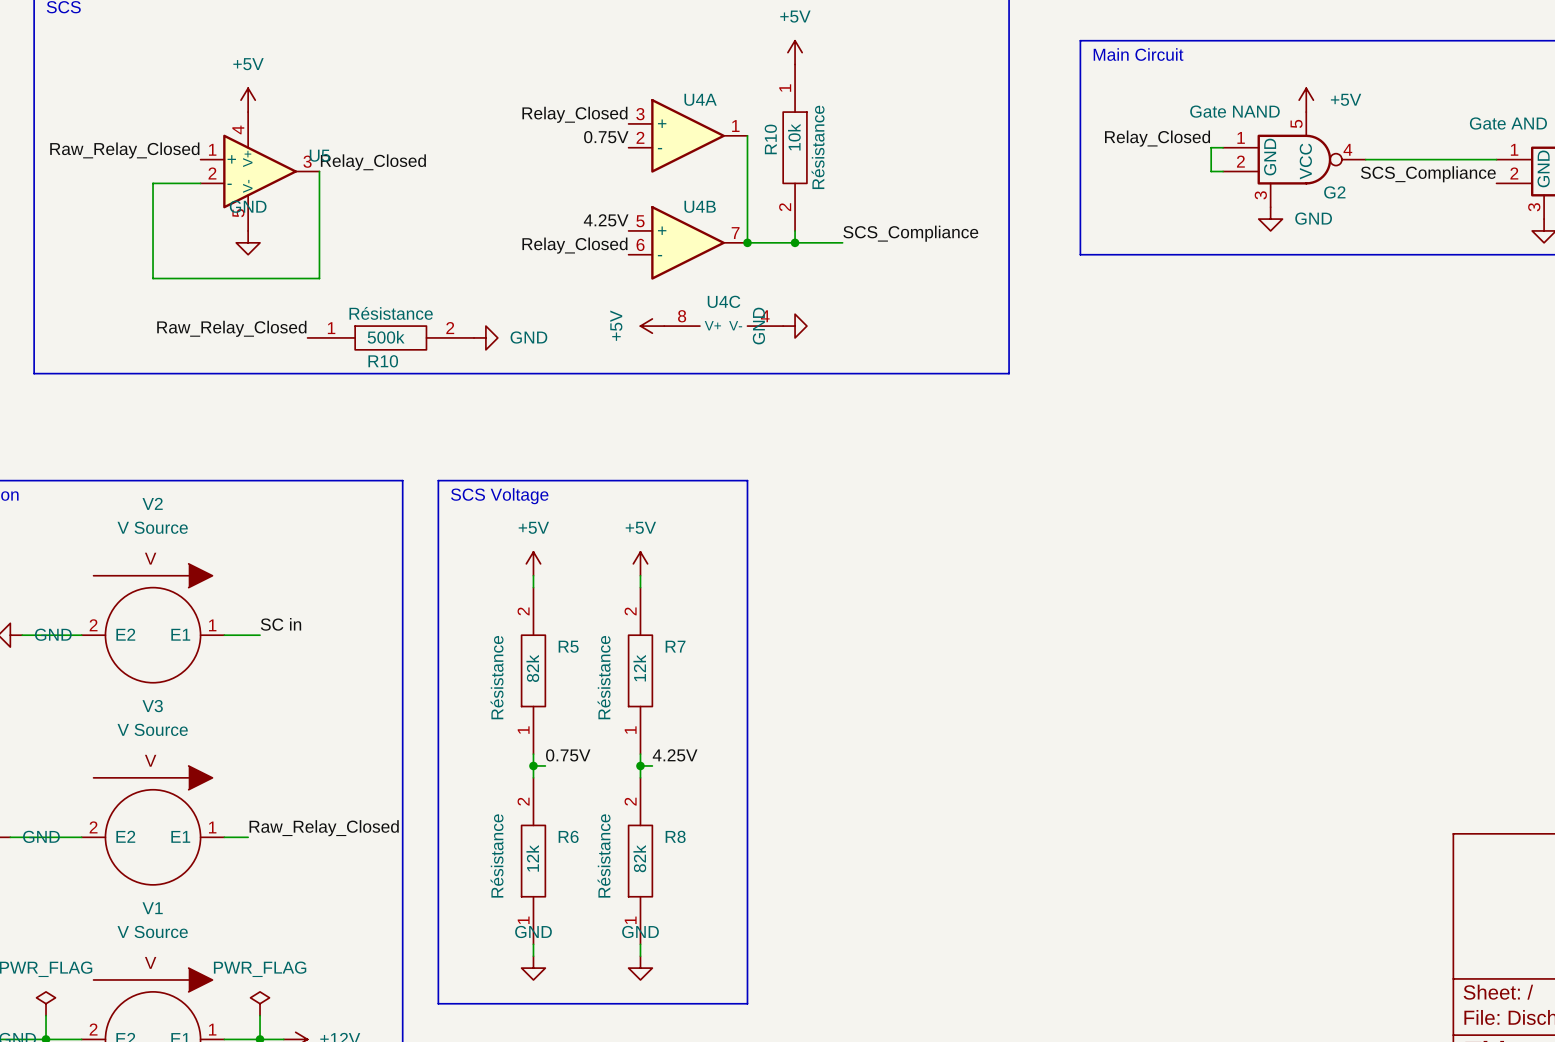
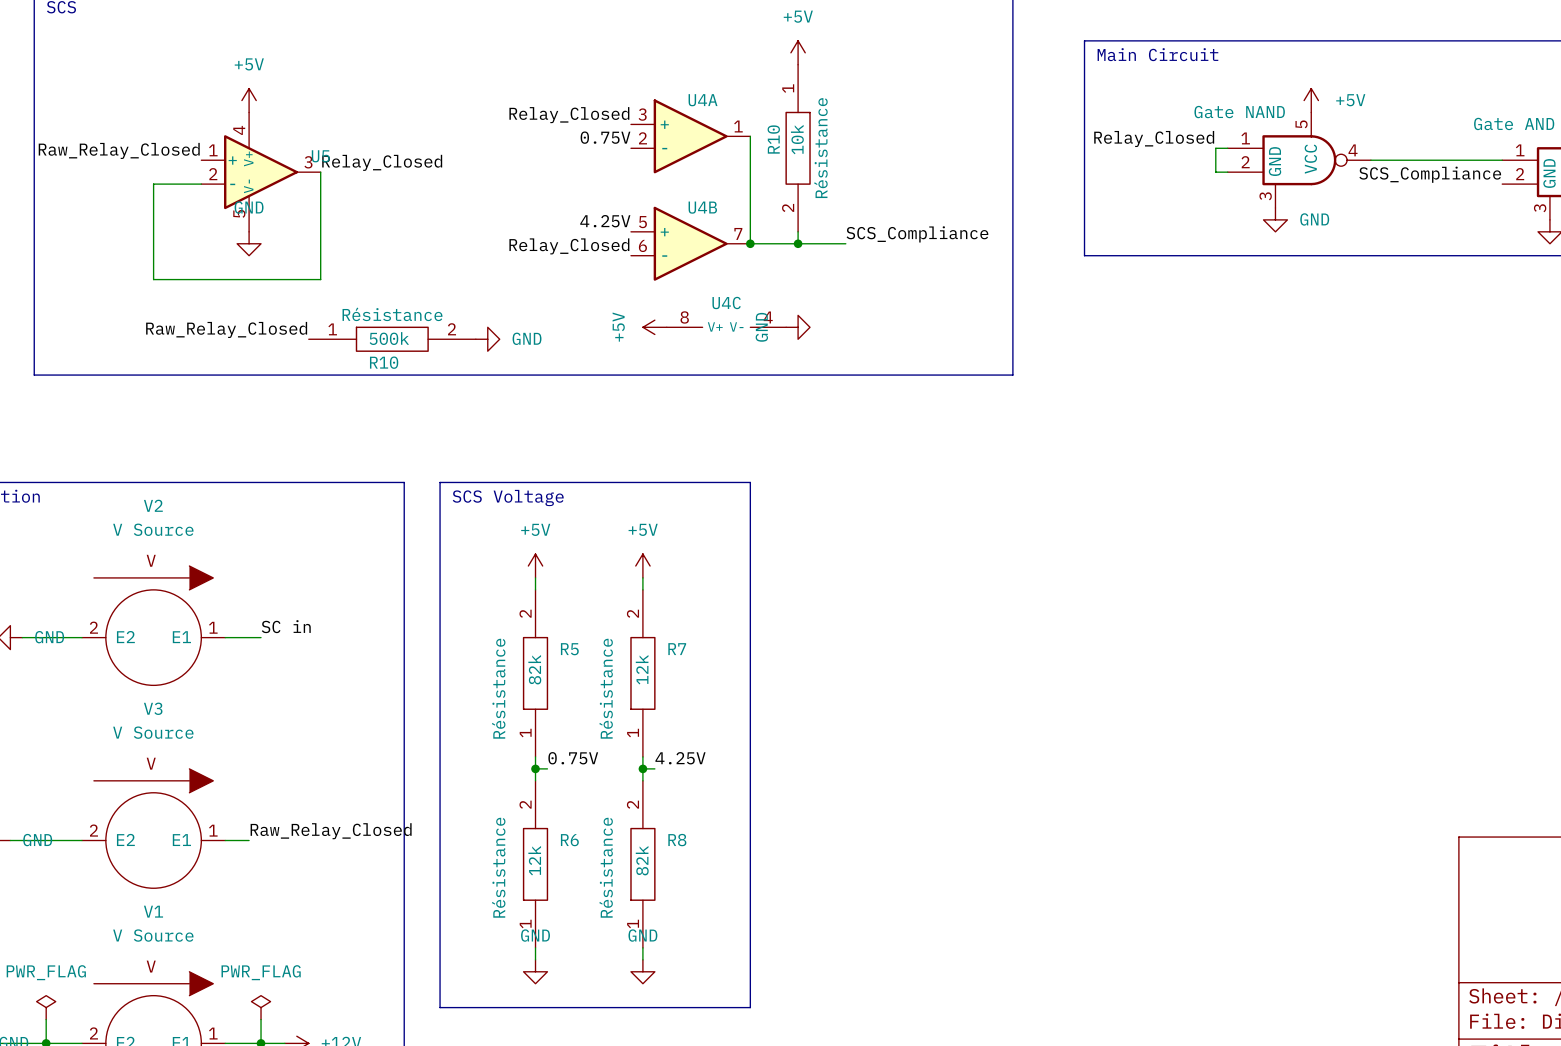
G2 name: G2 (1334, 192) -> none

